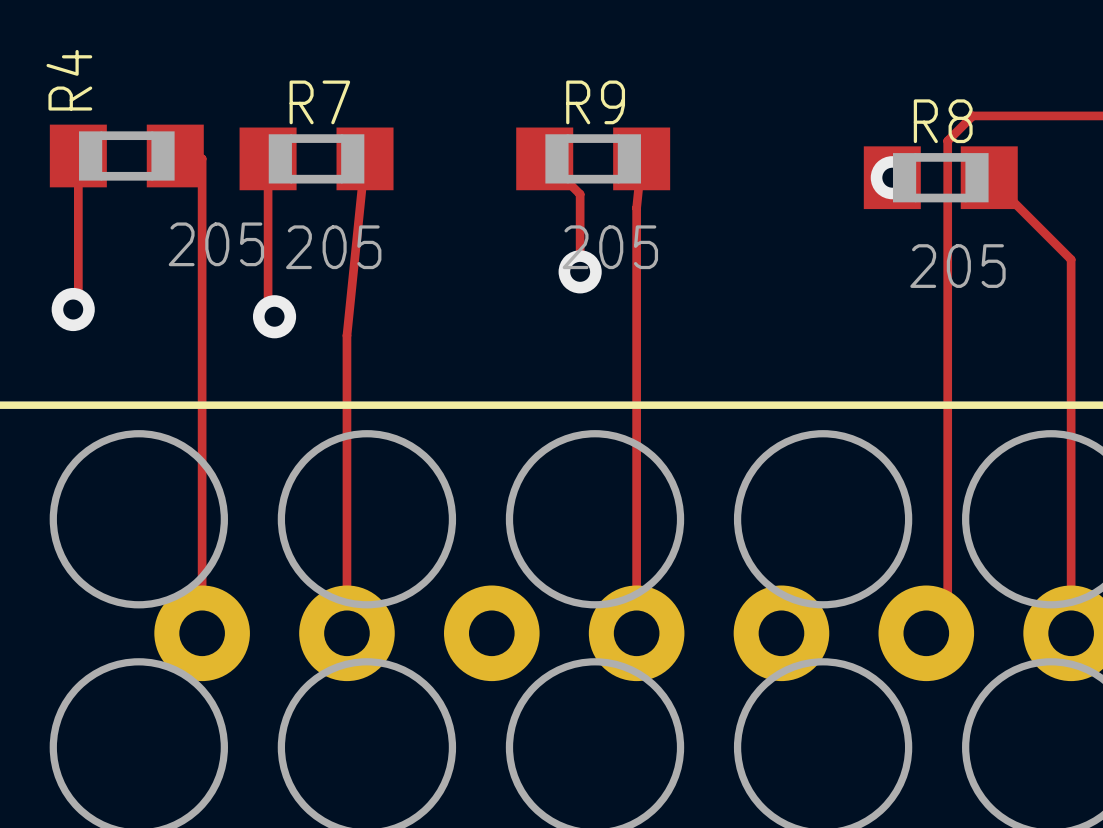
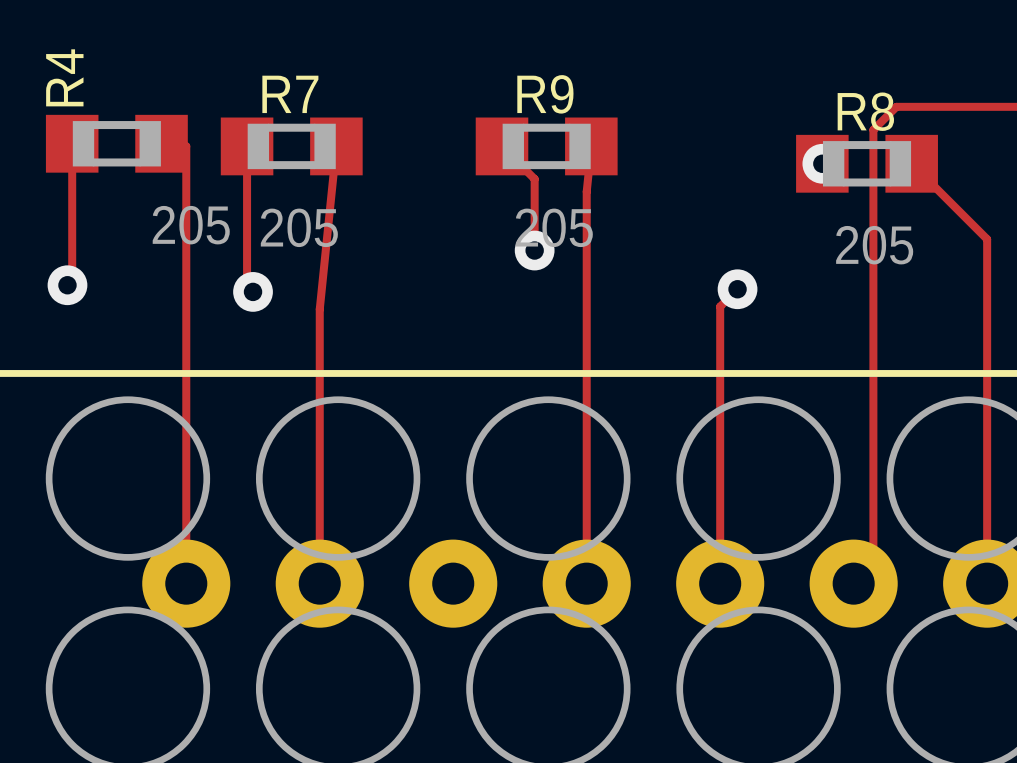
track: none -> (737, 289) (720, 306) (720, 583)
via: none -> (737, 289)

